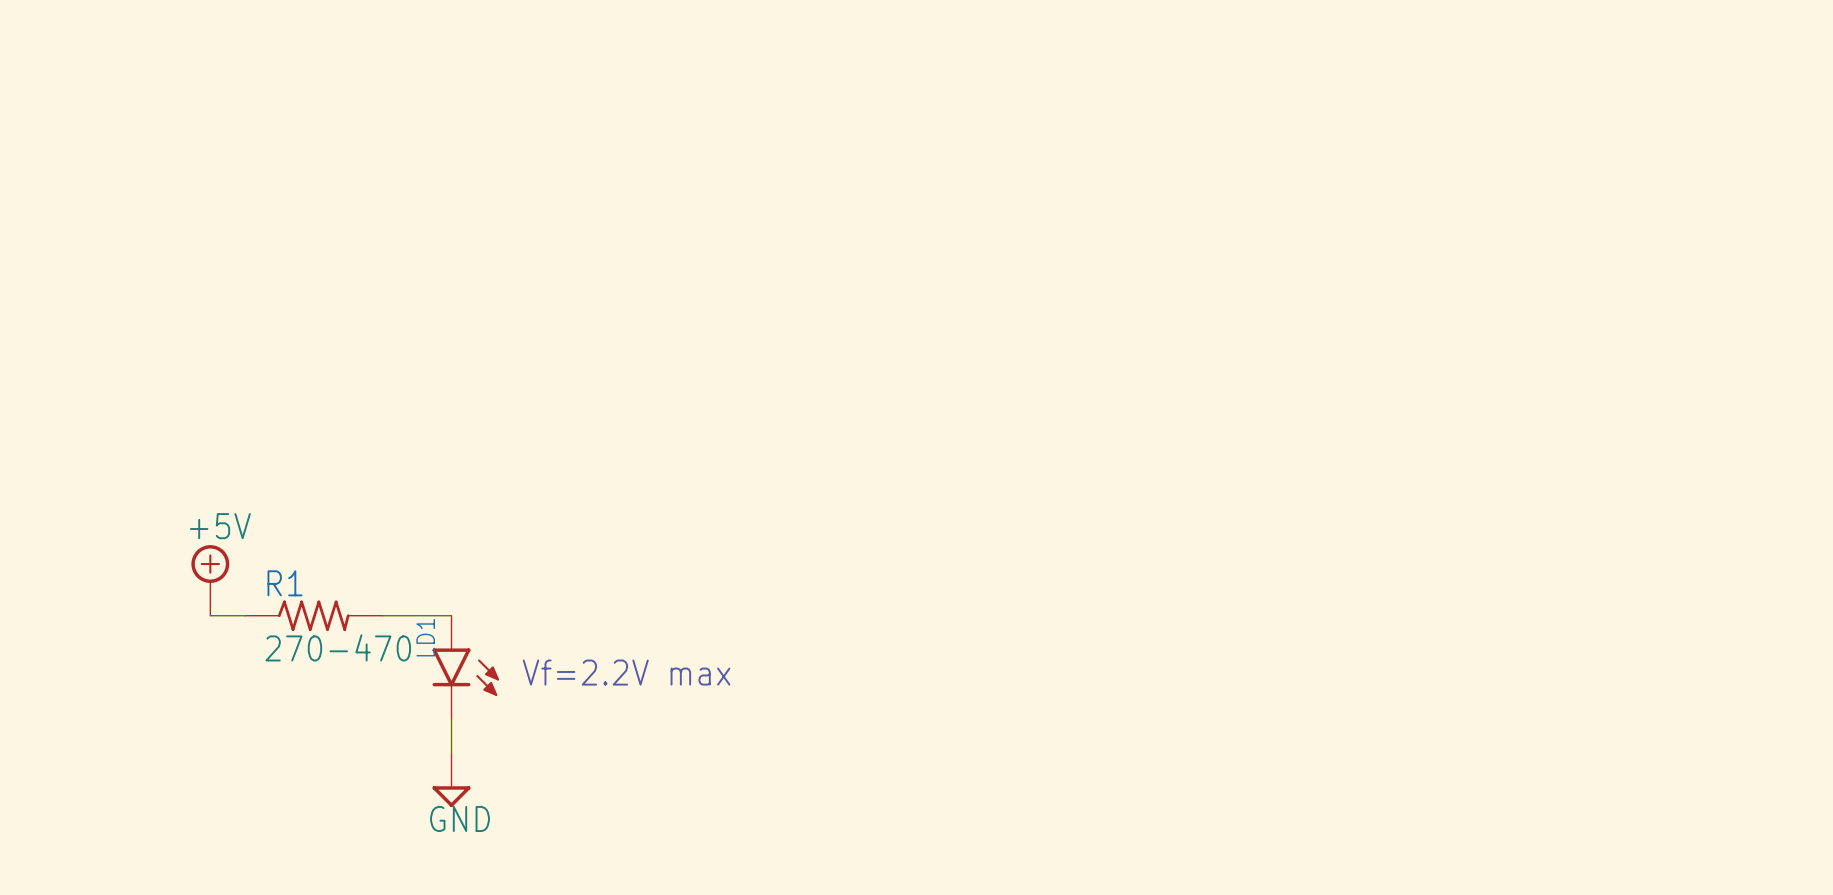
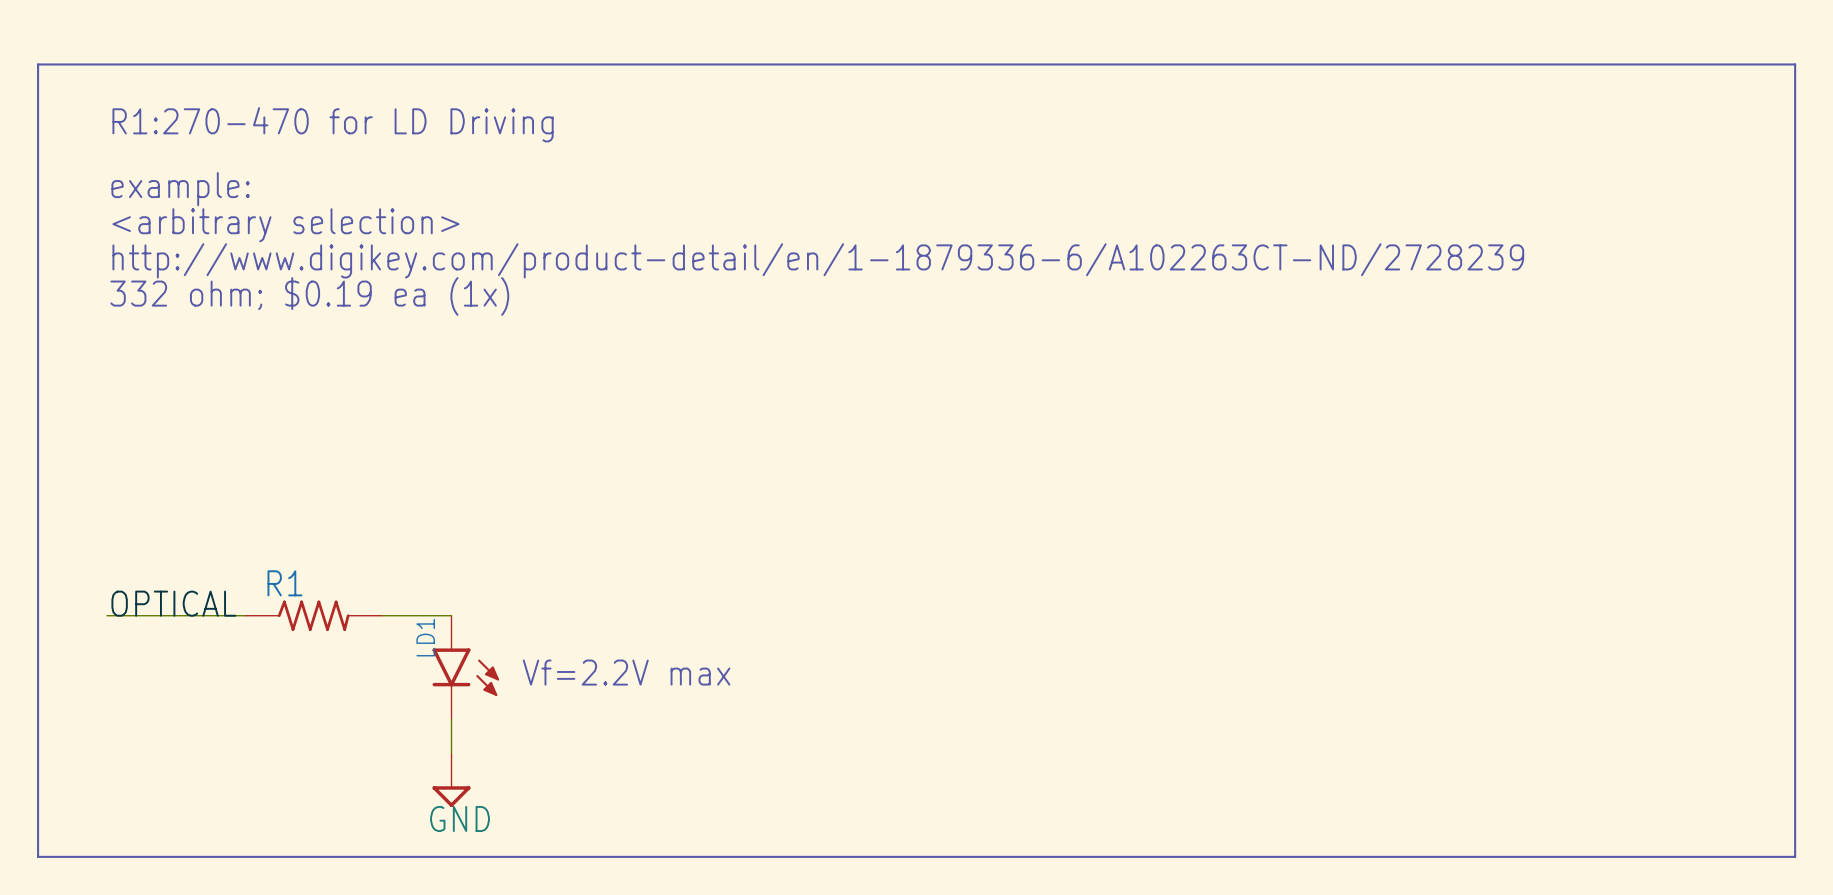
line: none -> (38, 64) (1795, 64) (1795, 856) (38, 856) (38, 64)
text: none -> R1:270-470 for LD Driving (333, 124)
text: none -> example: (180, 189)
text: none -> <arbitrary selection> (286, 225)
text: none -> http://www.digikey.com/product-detail/en/1-1879336-6/A102263CT-ND/2728239 (818, 260)
text: none -> 332 ohm; $0.19 ea (1x) (309, 296)
power symbol: +5V (210, 580) -> none
label: none -> OPTICAL (173, 603)
wire: none -> (106, 615) (210, 615)
R1 value: 270-470 (338, 647) -> none

